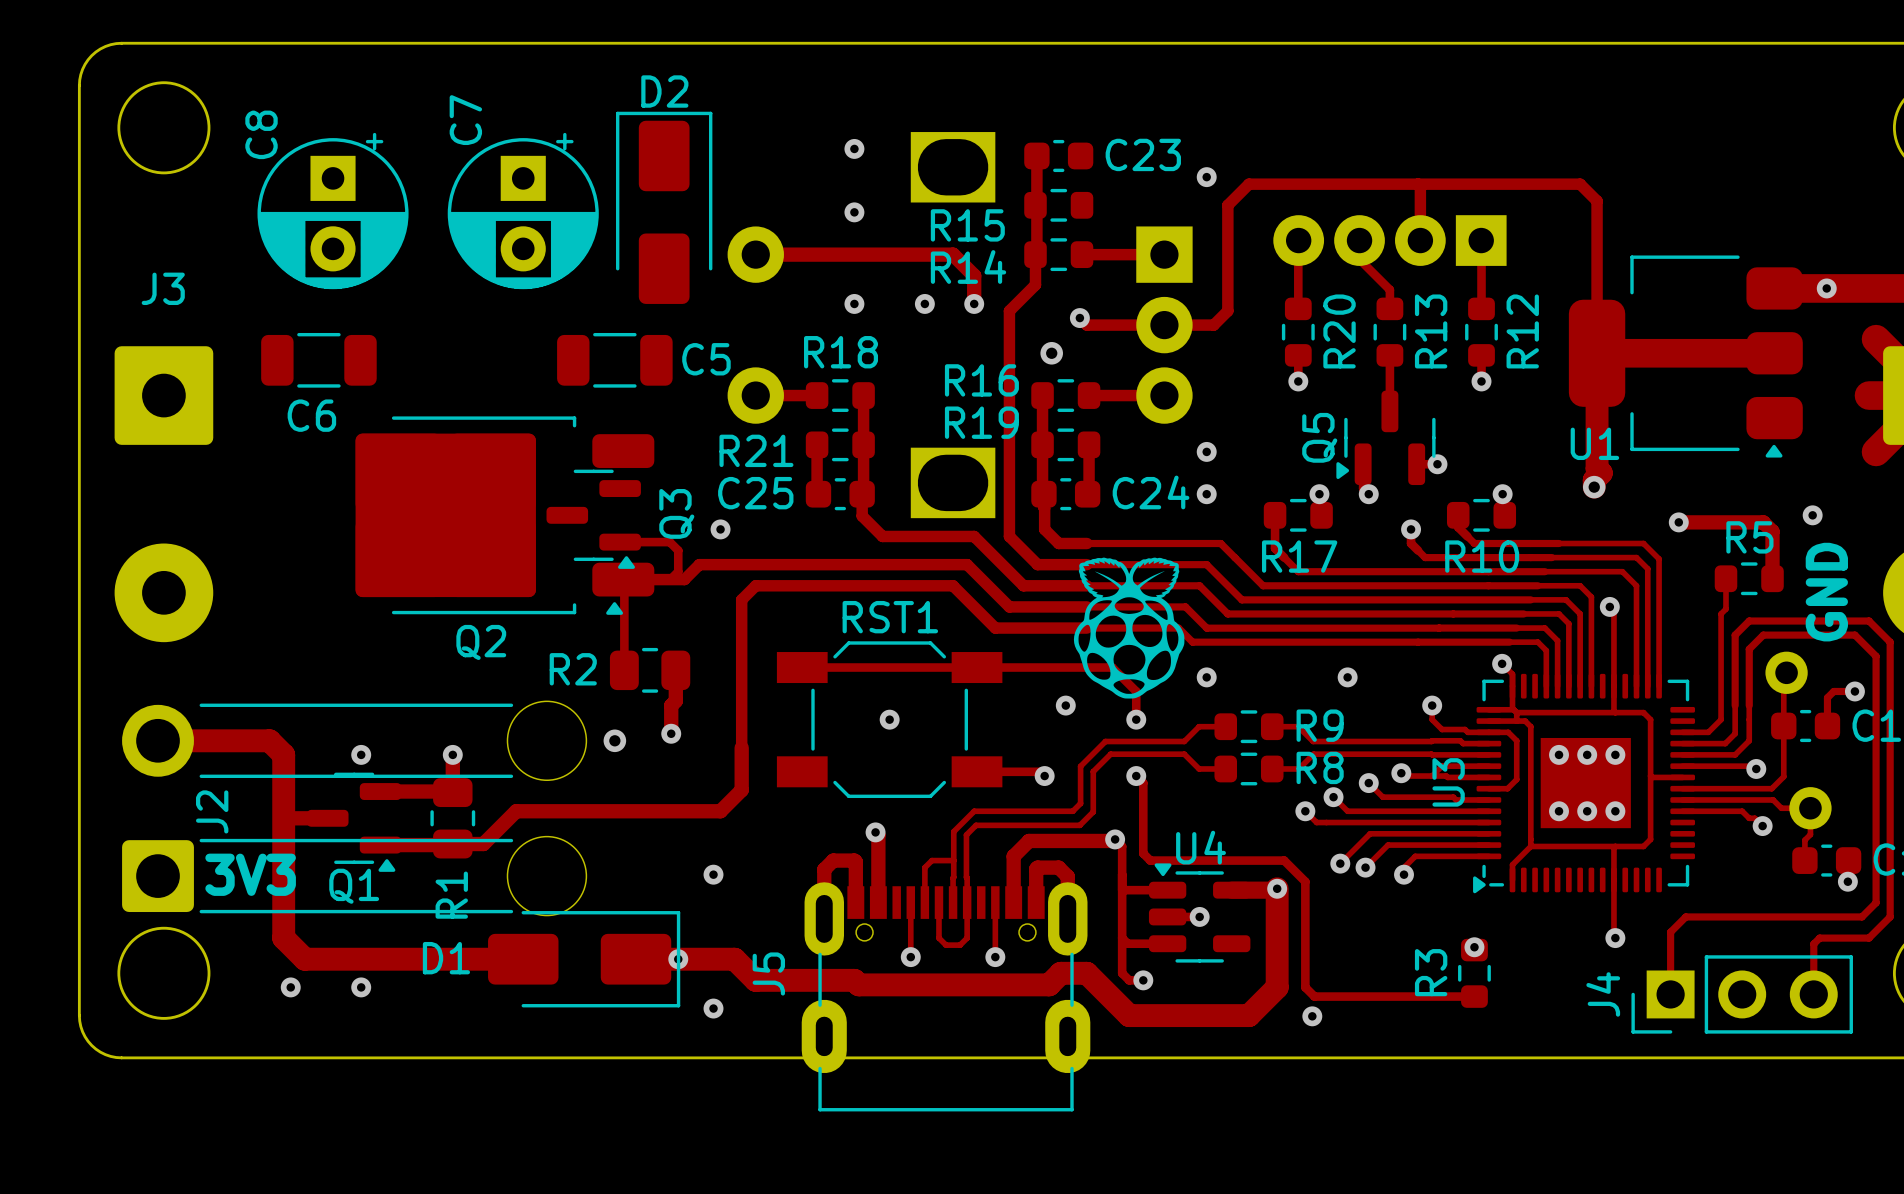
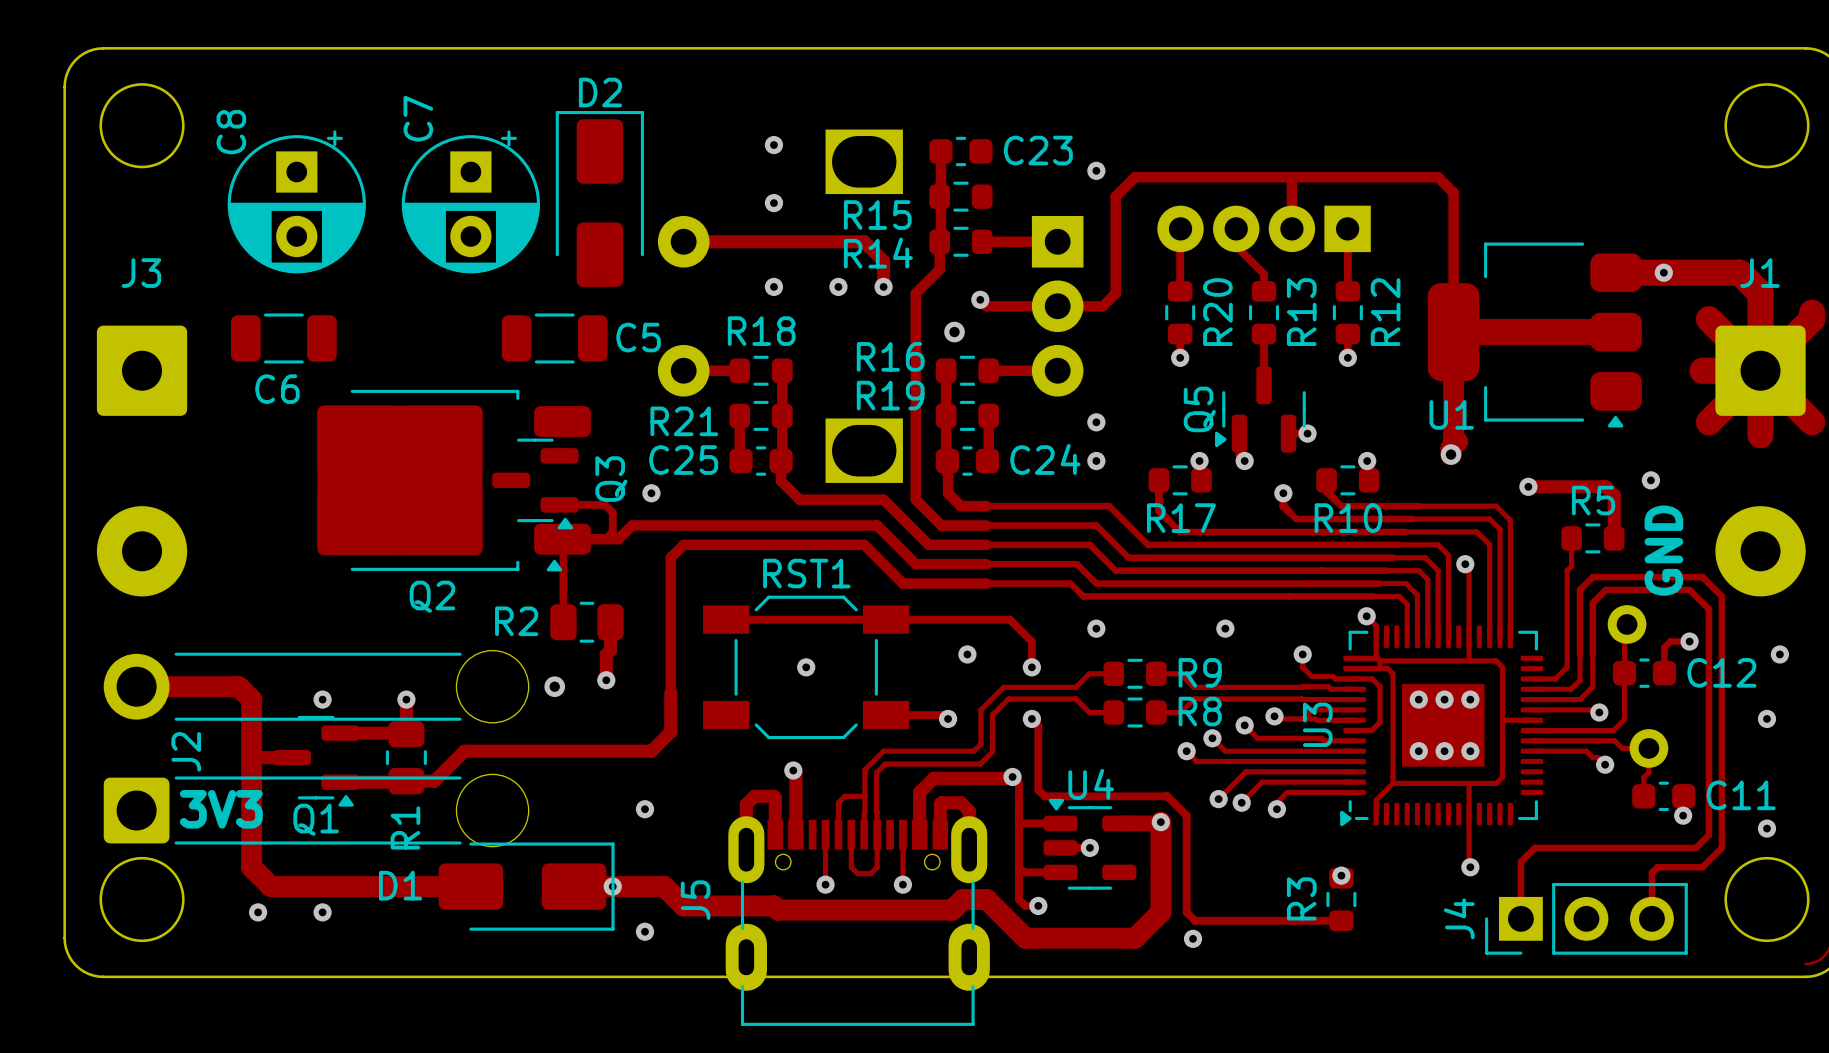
drawing: [1073, 557, 1185, 699] -> none

